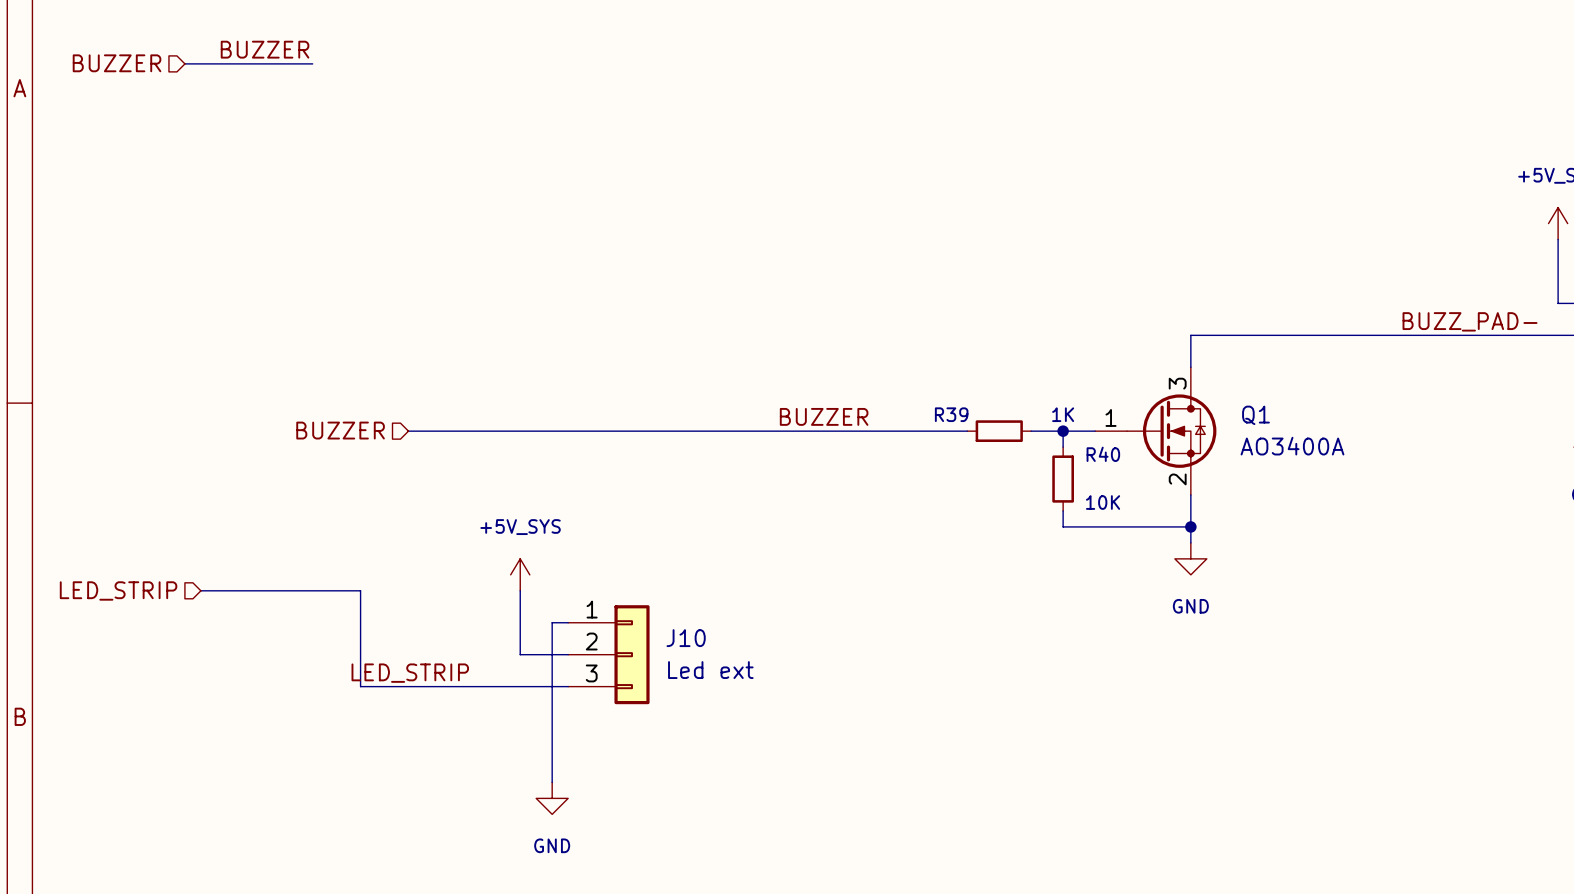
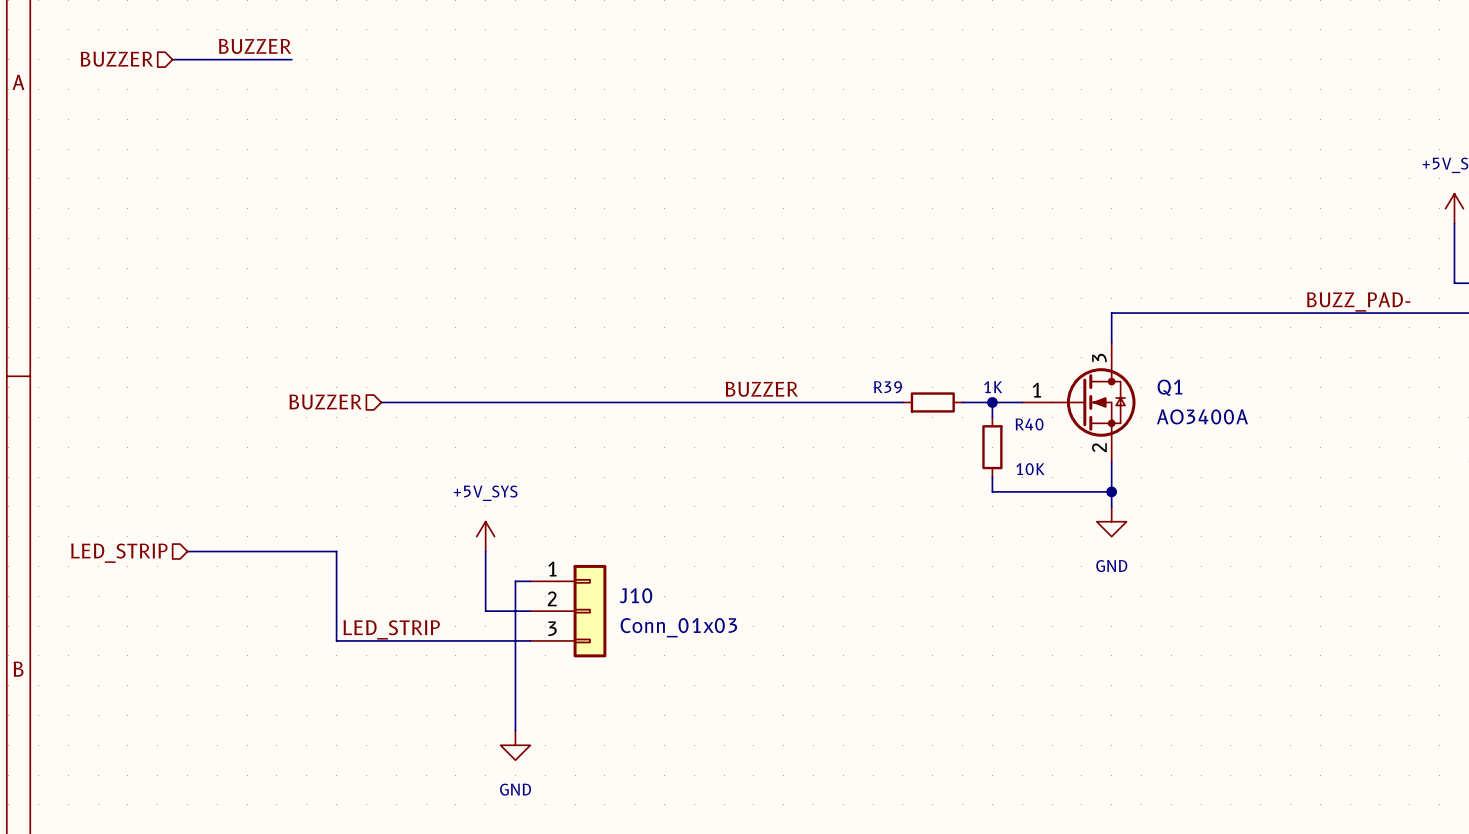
J10 value: Led ext (710, 670) -> Conn_01x03 (678, 627)

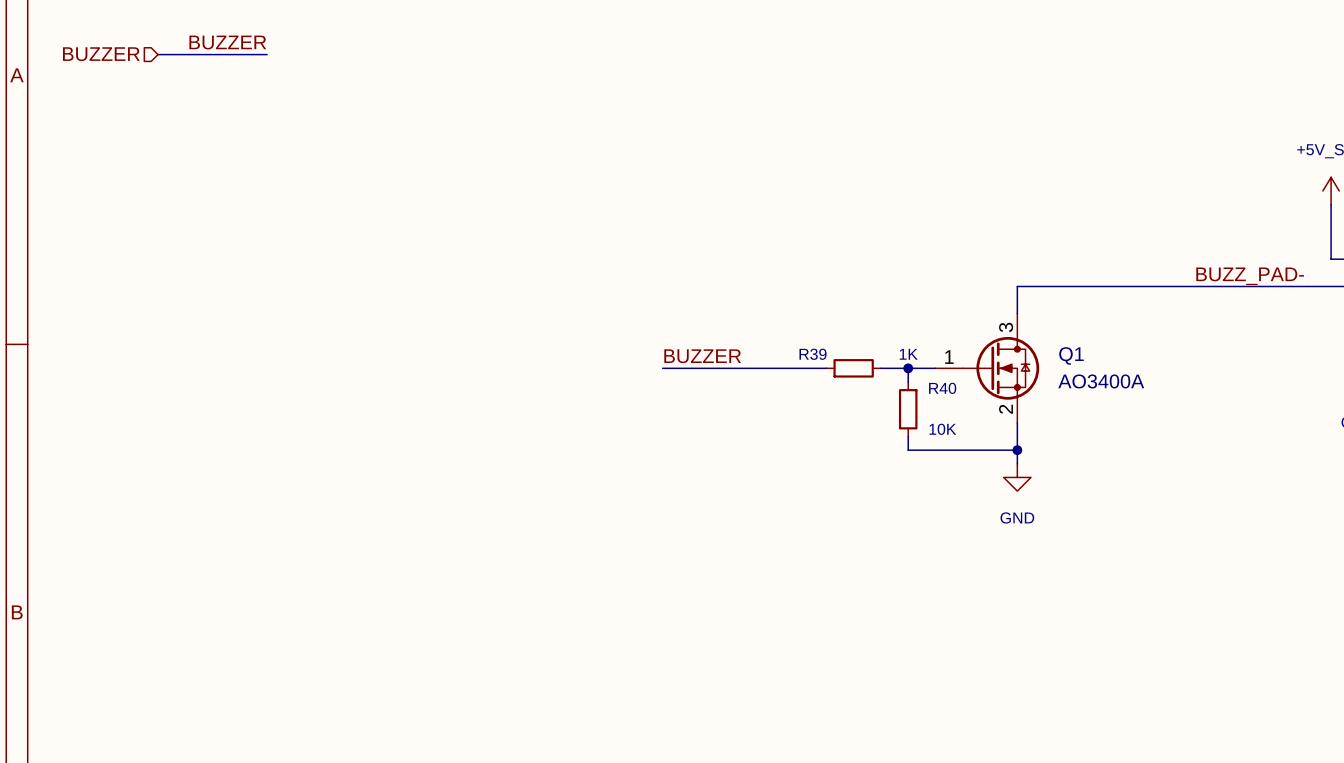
hierarchical label: BUZZER (325, 402) -> none
wire: (381, 402) (724, 402) -> none
power symbol: +5V_SYS (485, 536) -> none
wire: (187, 551) (336, 551) (336, 640) (530, 640) -> none
wire: (485, 551) (485, 611) (530, 611) -> none
hierarchical label: LED_STRIP (119, 553) -> none
wire: (530, 581) (515, 581) (515, 730) -> none
J10: Conn_01x03 (568, 611) -> none
label: LED_STRIP (391, 629) -> none
power symbol: GND (515, 745) -> none

